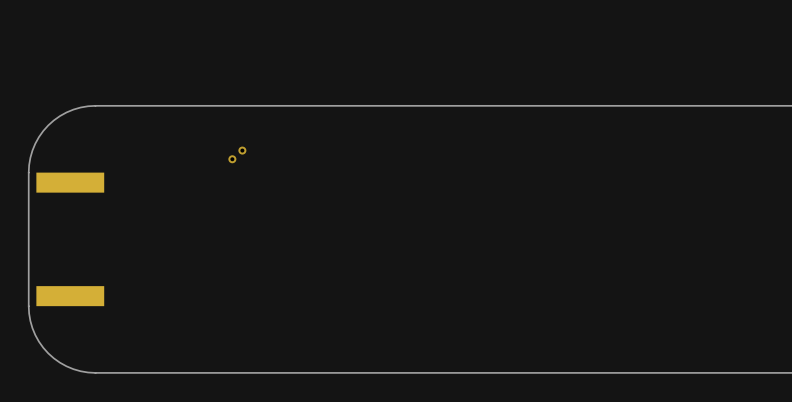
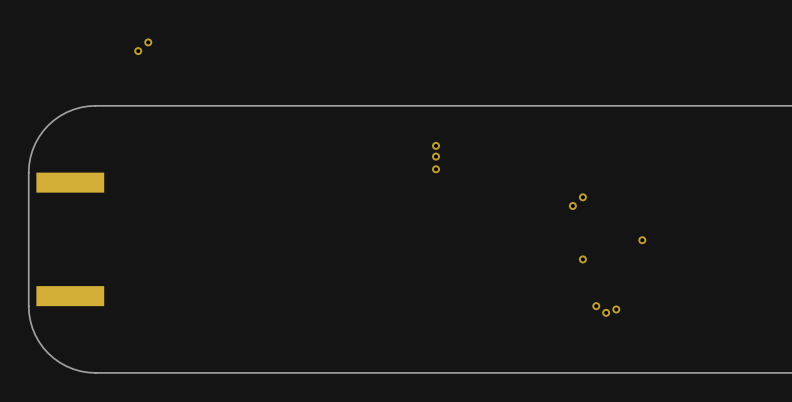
via: none -> (148, 42)
via: none -> (138, 51)
via: none -> (436, 145)
via: (242, 150) -> none
via: none -> (436, 156)
via: (232, 159) -> none
via: none -> (436, 169)
via: none -> (582, 197)
via: none -> (572, 205)
via: none -> (642, 240)
via: none -> (582, 259)
via: none -> (596, 306)
via: none -> (616, 309)
via: none -> (606, 312)

